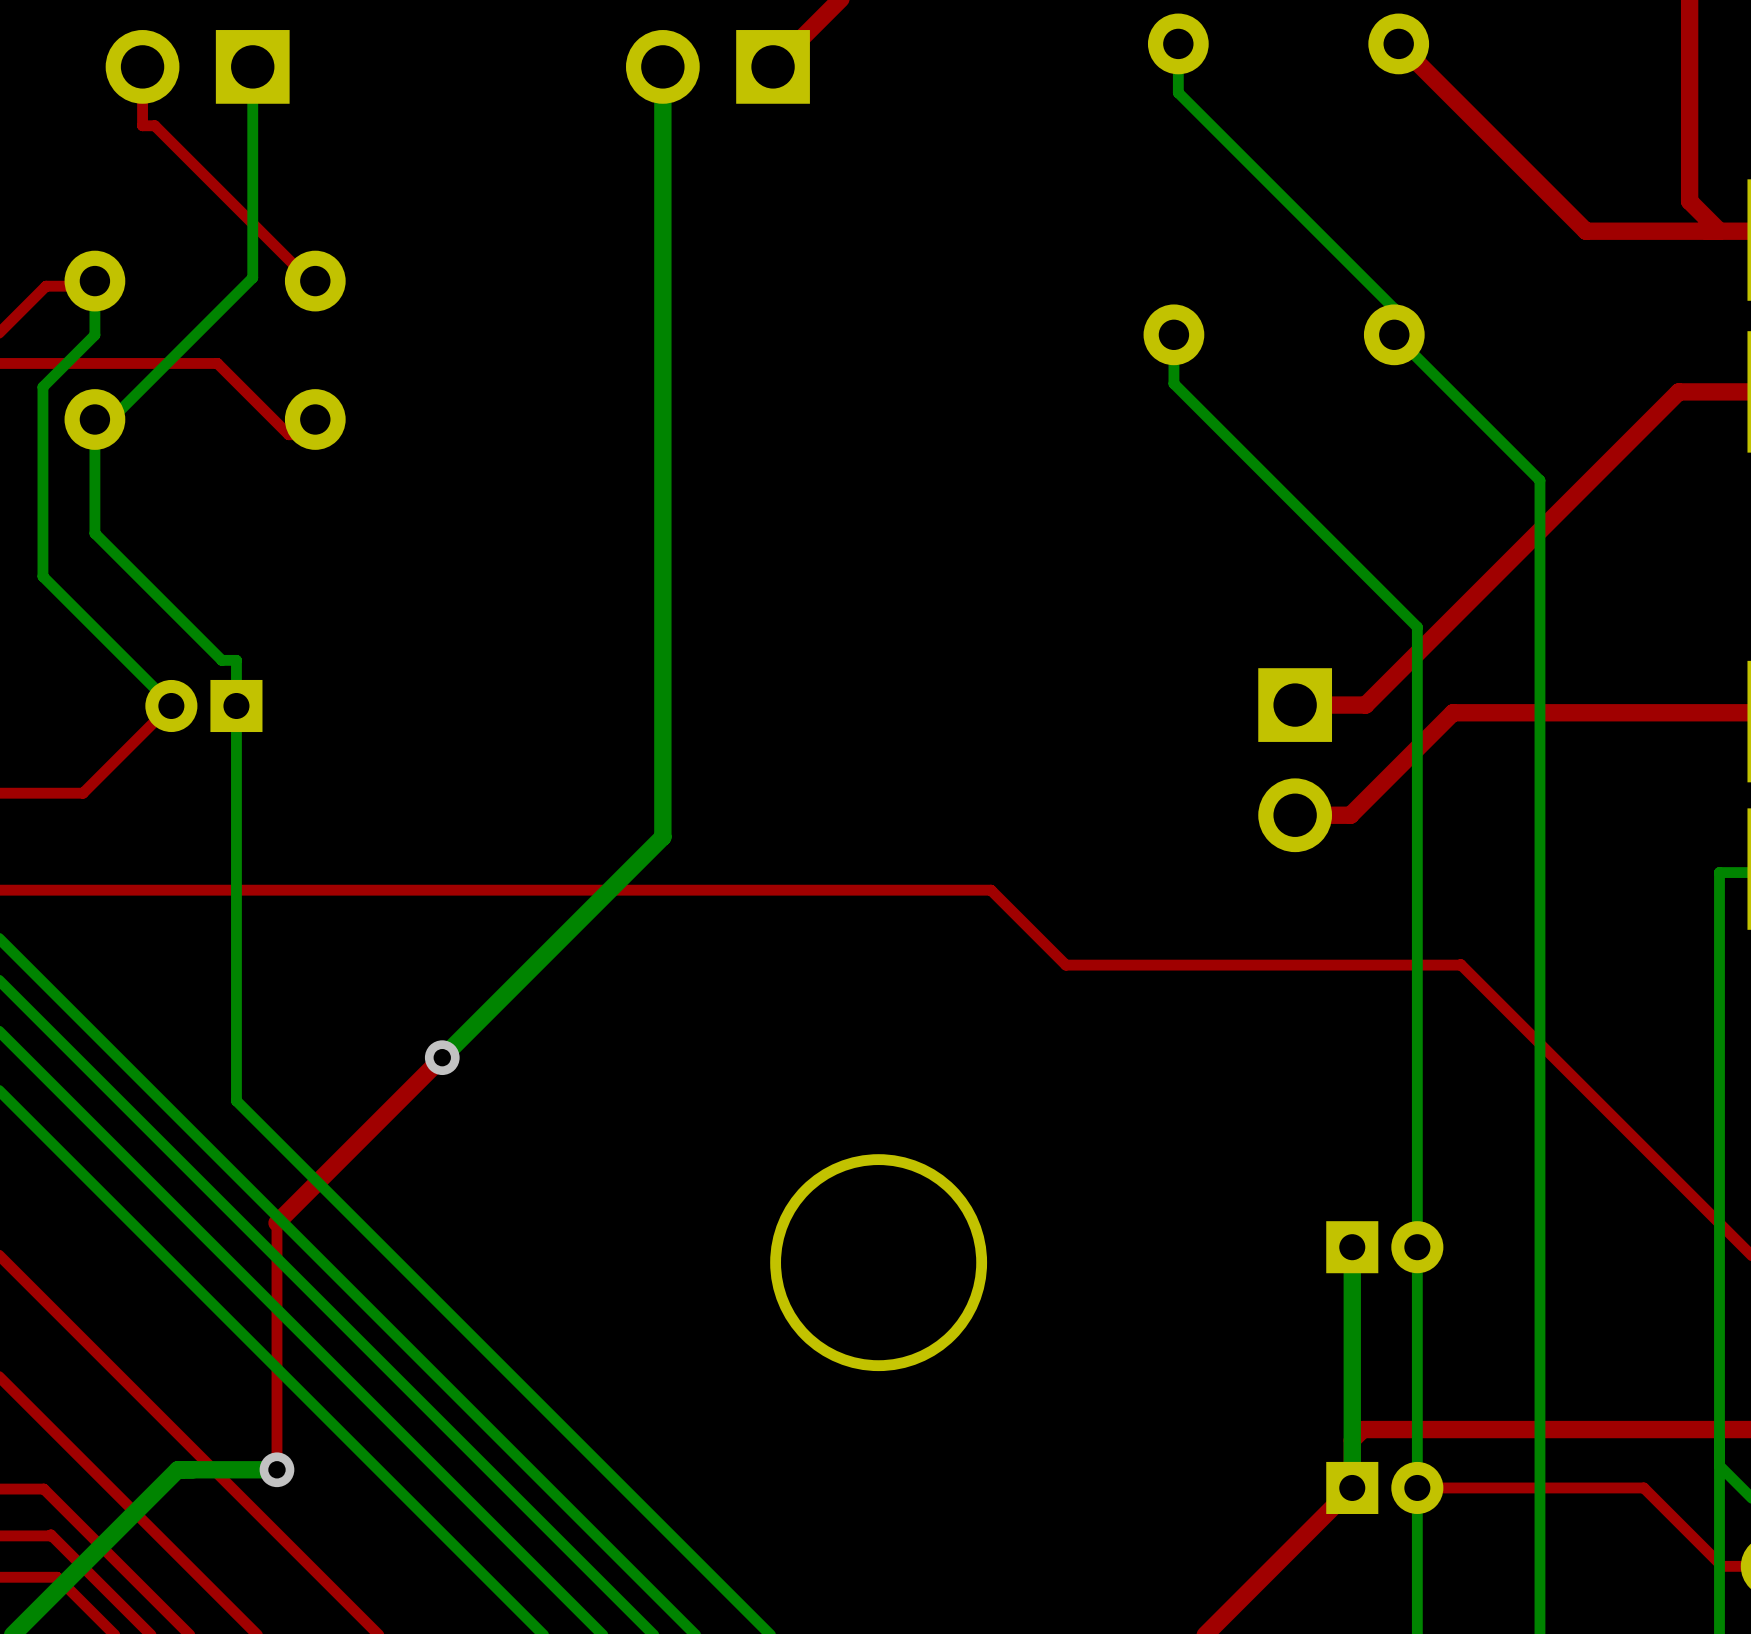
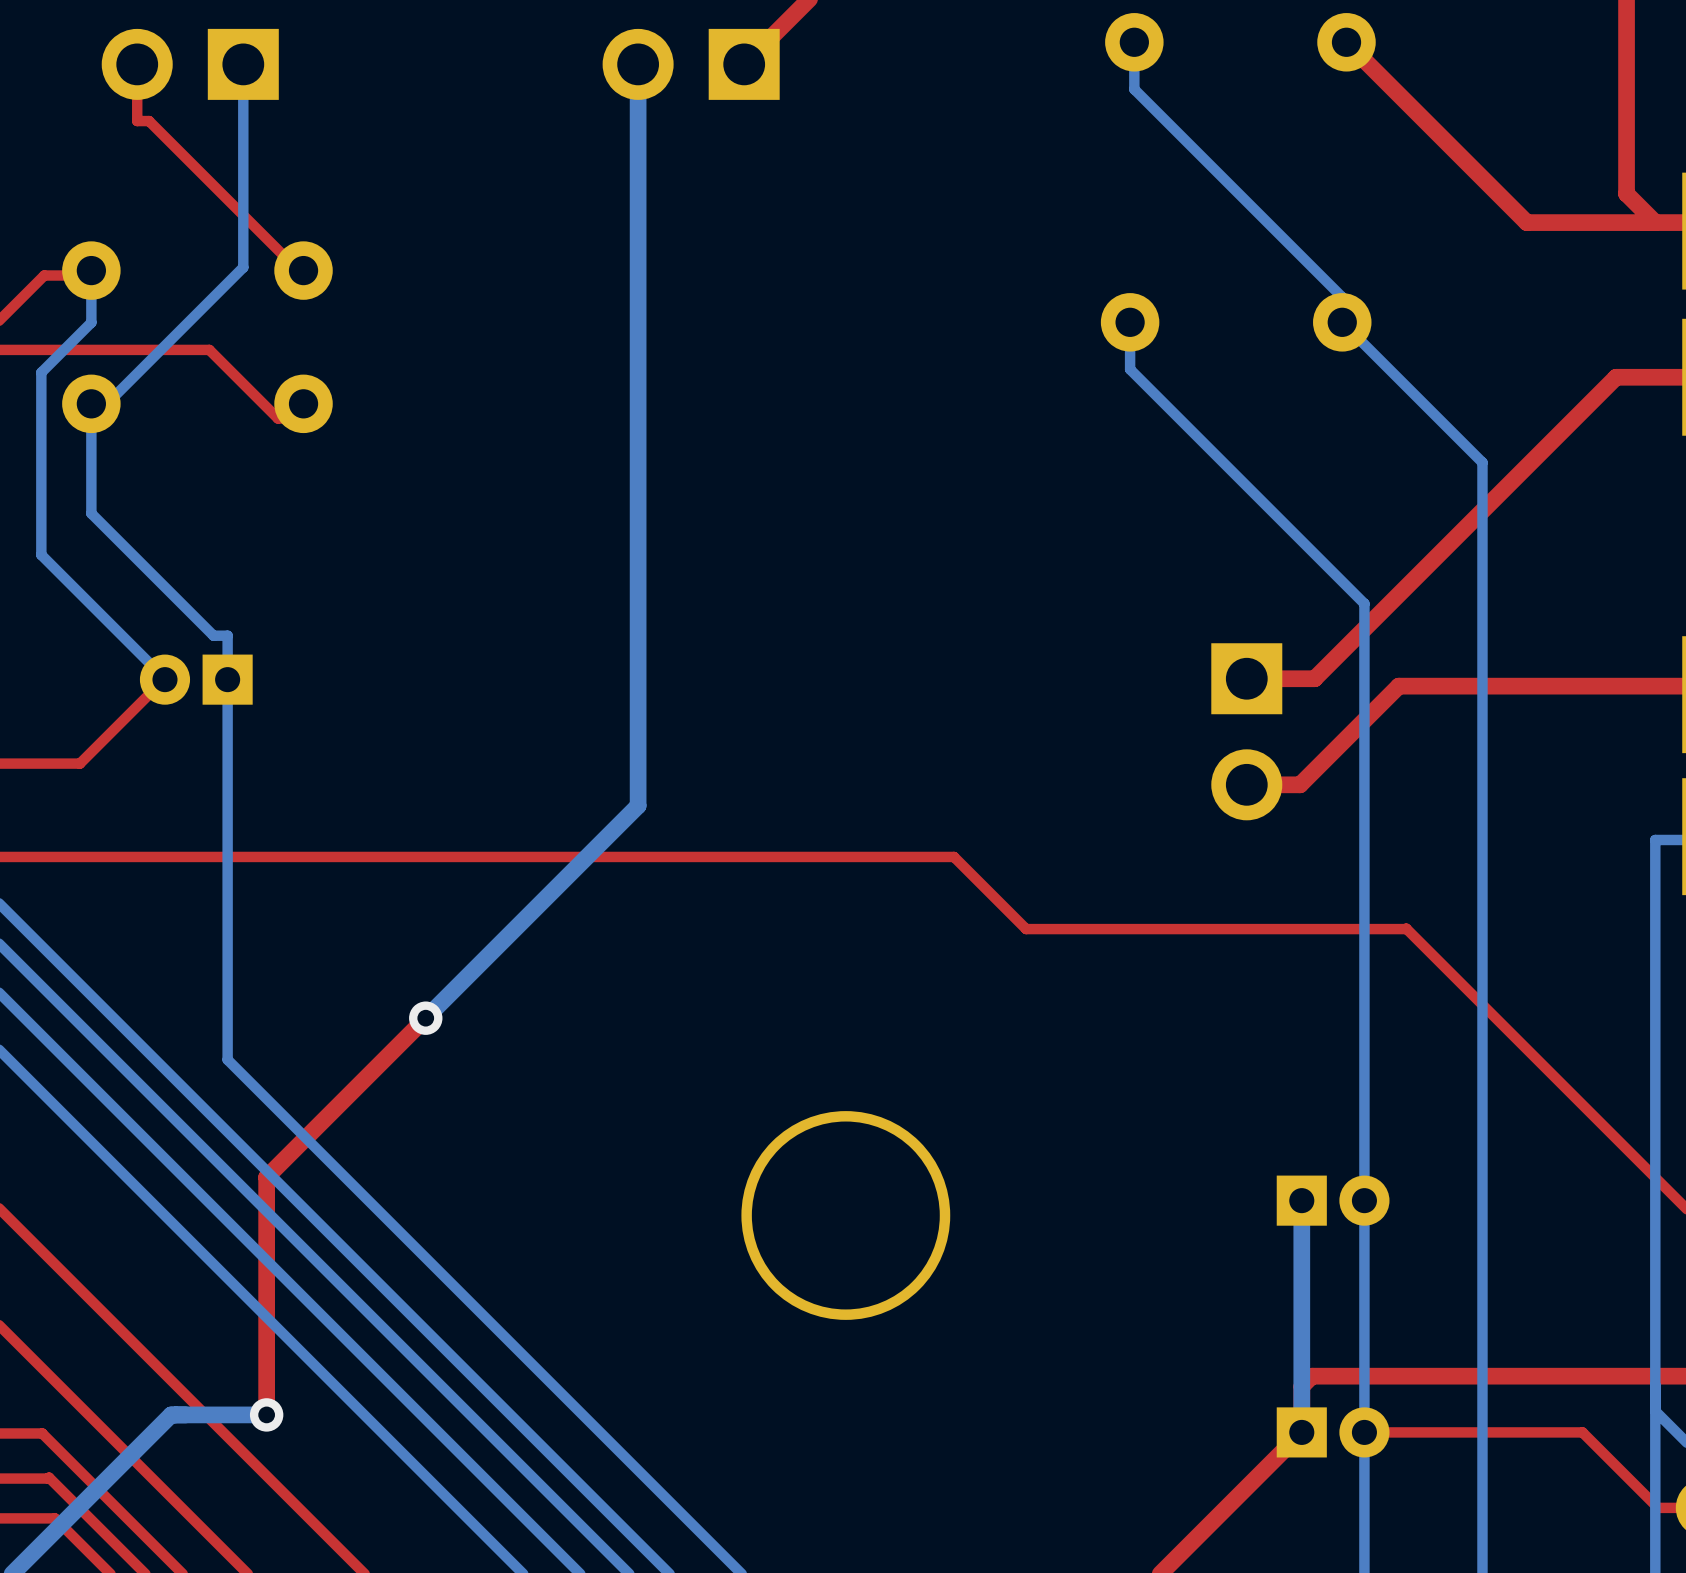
top track width: thin (276, 1222) (276, 1469) -> thick (266, 1177) (266, 1414)

